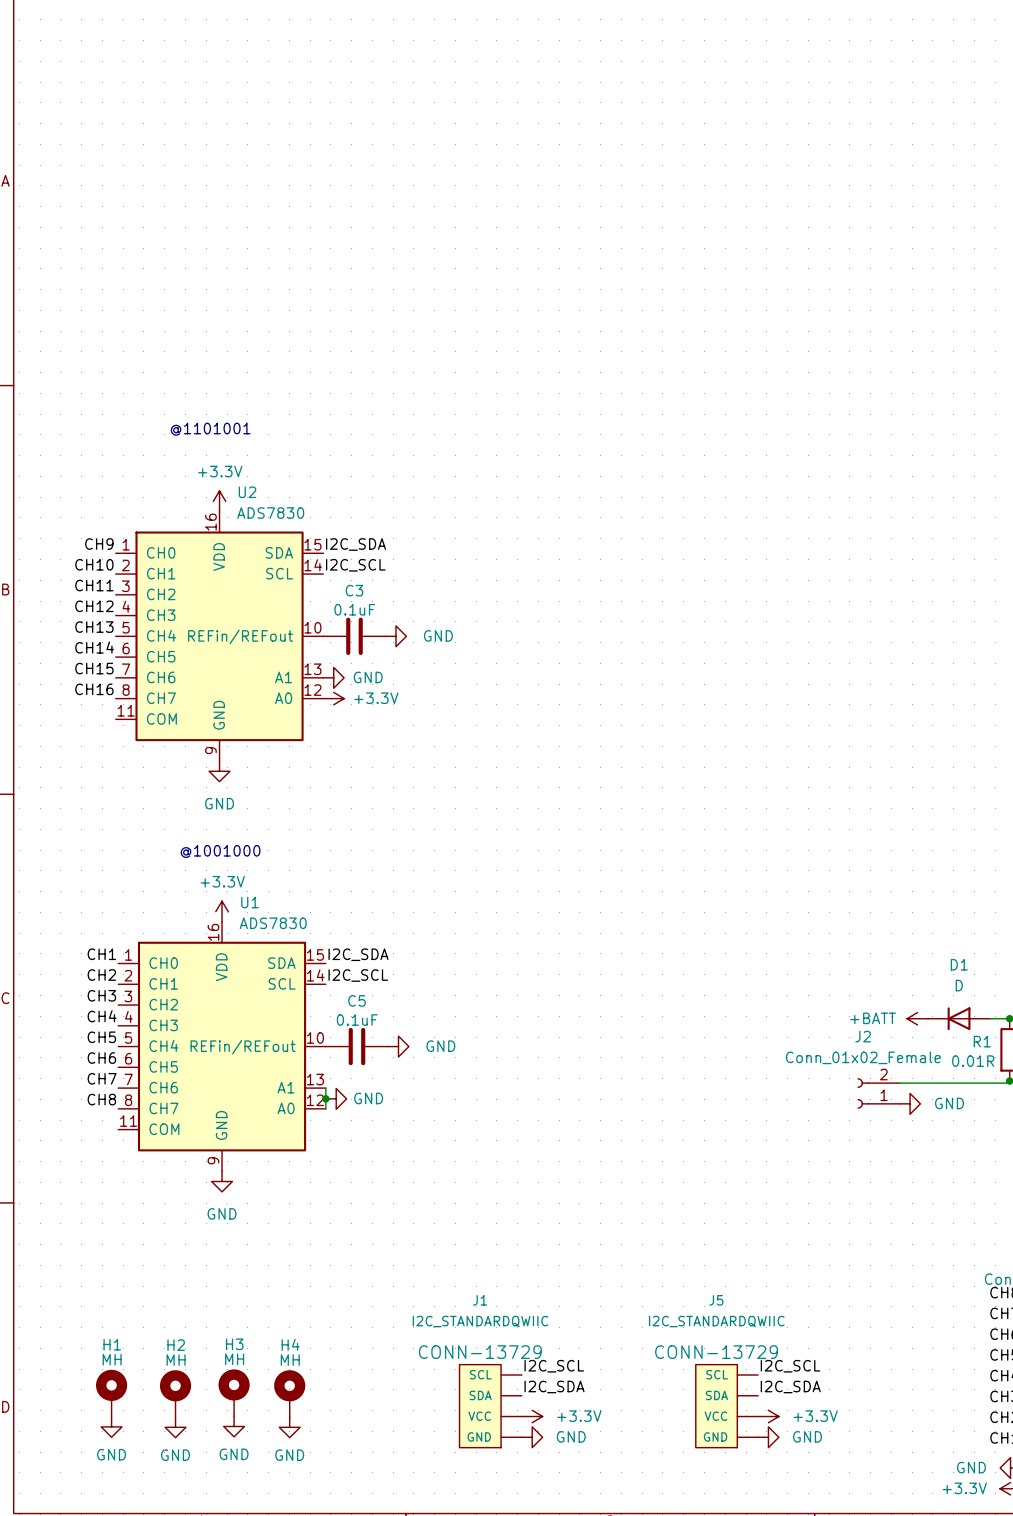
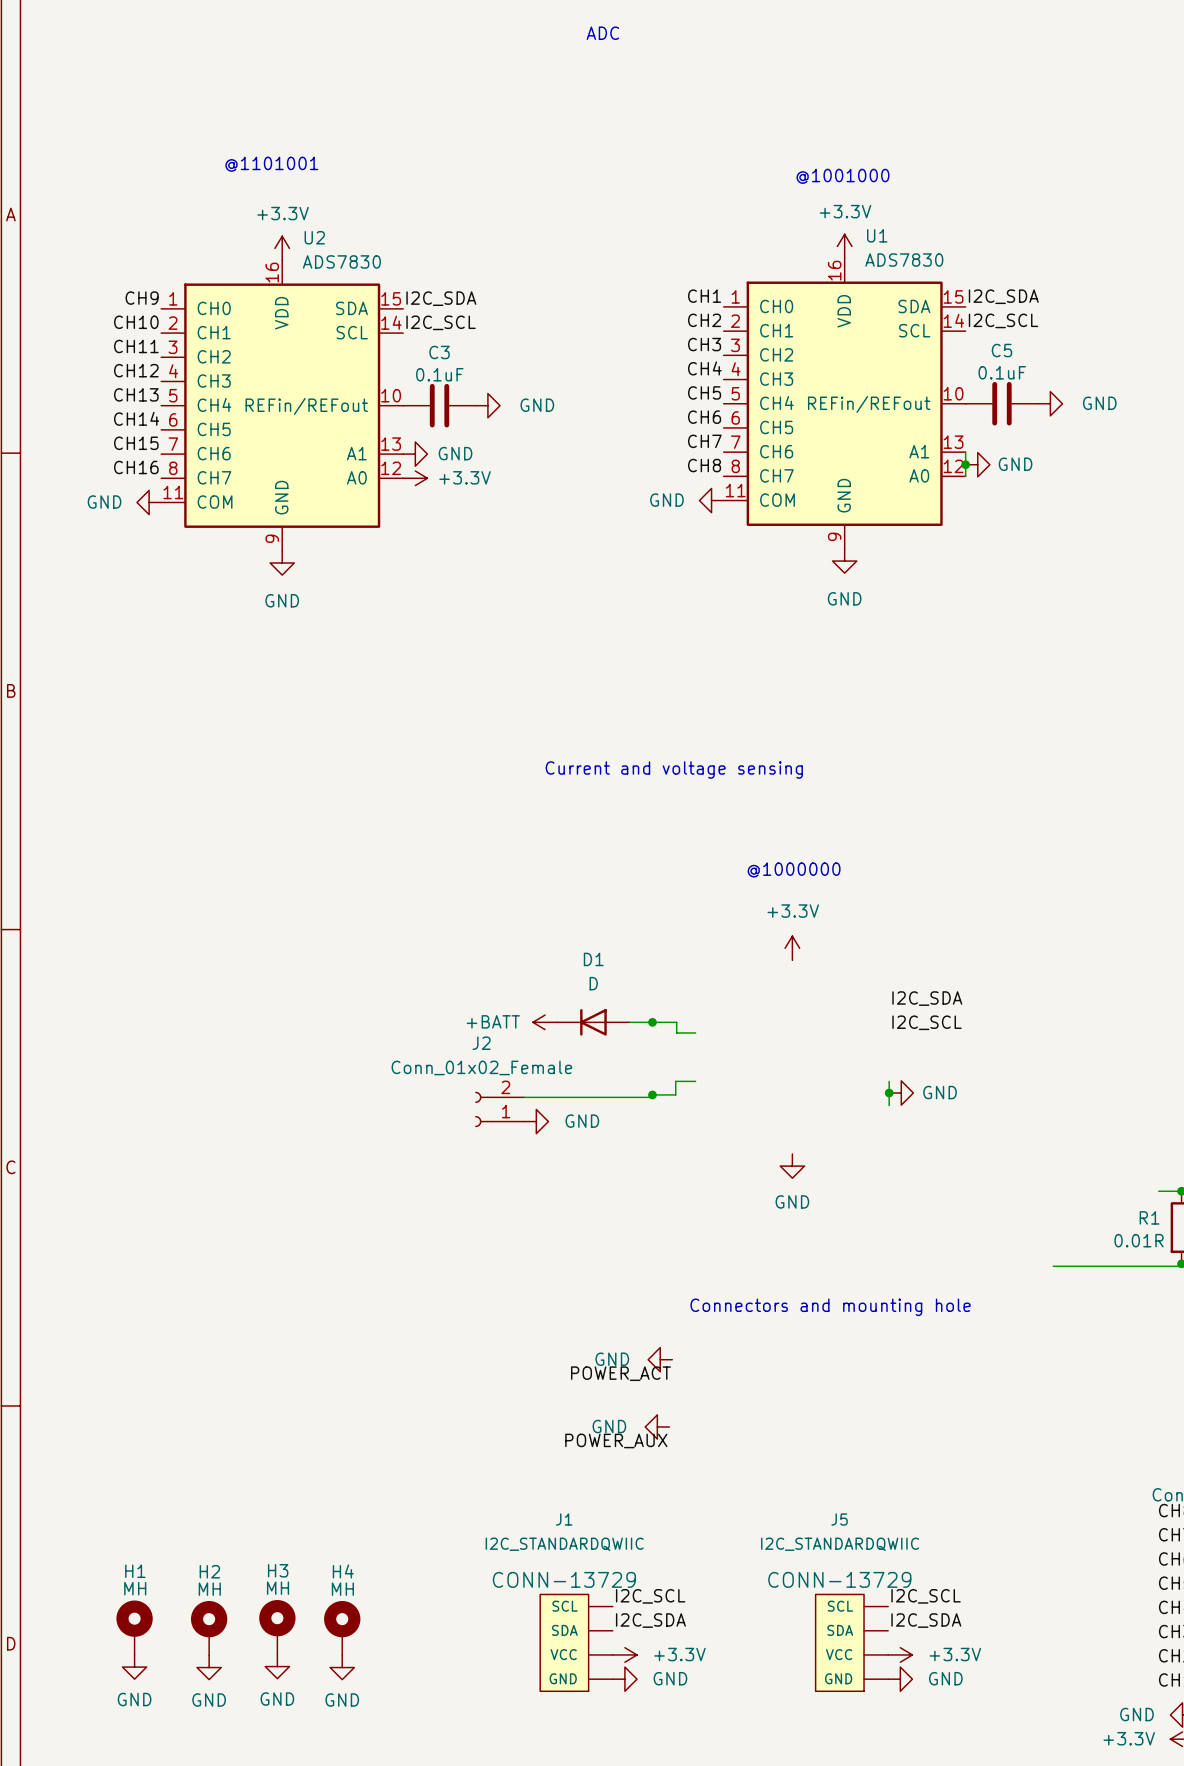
text: none -> ADC (602, 33)
text: none -> @1101001 (271, 164)
text: none -> @1001000 (842, 176)
power symbol: none -> +3.3V (844, 246)
power symbol: none -> +3.3V (282, 248)
label: none -> CH1 (704, 296)
label: none -> I2C_SDA (1003, 296)
label: none -> CH9 (142, 298)
label: none -> I2C_SDA (441, 298)
label: none -> CH2 (704, 320)
label: none -> I2C_SCL (1003, 320)
label: none -> CH10 (136, 322)
label: none -> I2C_SCL (441, 322)
label: none -> CH3 (704, 344)
label: none -> CH11 (136, 346)
label: none -> CH4 (704, 368)
label: none -> CH12 (136, 370)
label: none -> CH5 (704, 392)
label: none -> CH13 (136, 394)
power symbol: none -> GND (1050, 403)
power symbol: none -> GND (487, 405)
label: none -> CH6 (704, 417)
label: none -> CH14 (136, 418)
label: none -> CH7 (704, 441)
label: none -> CH15 (136, 443)
wire: none -> (965, 452) (965, 476)
power symbol: none -> GND (415, 454)
junction: none -> (965, 464)
power symbol: none -> GND (977, 464)
label: none -> CH8 (704, 465)
label: none -> CH16 (136, 467)
power symbol: none -> +3.3V (415, 478)
power symbol: none -> GND (711, 500)
power symbol: none -> GND (149, 502)
text: @1101001 (210, 429) -> none
power symbol: none -> GND (844, 561)
power symbol: none -> GND (282, 562)
power symbol: +3.3V (219, 501) -> none
label: CH9 (99, 544) -> none
label: I2C_SDA (356, 544) -> none
label: CH10 (94, 564) -> none
label: I2C_SCL (355, 565) -> none
label: CH11 (94, 585) -> none
label: CH12 (94, 606) -> none
label: CH13 (94, 627) -> none
U2 position: (219, 636) -> (282, 405)
C3 position: (354, 636) -> (439, 405)
power symbol: GND (396, 636) -> none
label: CH14 (94, 647) -> none
text: none -> Current and voltage sensing (674, 770)
label: CH15 (94, 668) -> none
power symbol: GND (333, 677) -> none
label: CH16 (94, 689) -> none
power symbol: +3.3V (333, 698) -> none
text: none -> @1000000 (794, 870)
power symbol: GND (219, 771) -> none
power symbol: none -> +3.3V (792, 948)
text: @1001000 (220, 851) -> none
label: none -> I2C_SDA (927, 998)
power symbol: none -> +BATT (545, 1022)
wire: none -> (629, 1022) (676, 1022) (676, 1032) (695, 1032)
junction: none -> (652, 1022)
label: none -> I2C_SCL (927, 1022)
power symbol: +3.3V (222, 911) -> none
wire: none -> (695, 1081) (675, 1081) (675, 1094) (652, 1094) (652, 1097) (524, 1097)
wire: none -> (889, 1081) (889, 1105)
junction: none -> (889, 1093)
power symbol: none -> GND (901, 1093)
junction: none -> (652, 1094)
label: CH1 (101, 954) -> none
label: I2C_SDA (358, 954) -> none
power symbol: none -> GND (536, 1121)
label: CH2 (101, 975) -> none
label: I2C_SCL (358, 975) -> none
label: CH3 (101, 995) -> none
power symbol: none -> GND (792, 1166)
label: CH4 (102, 1016) -> none
power symbol: +BATT (917, 1018) -> none
D1 position: (959, 1018) -> (593, 1022)
label: CH5 (101, 1037) -> none
U1 position: (222, 1046) -> (844, 403)
C5 position: (356, 1046) -> (1001, 403)
power symbol: GND (398, 1046) -> none
label: CH6 (101, 1058) -> none
label: CH7 (102, 1078) -> none
wire: (325, 1088) (325, 1108) -> none
J2 position: (878, 1093) -> (499, 1109)
junction: (325, 1098) -> none
power symbol: GND (336, 1098) -> none
label: CH8 (101, 1099) -> none
power symbol: GND (910, 1103) -> none
text: none -> Connectors and mounting hole (830, 1307)
power symbol: none -> GND (660, 1359)
label: none -> POWER_ACT (620, 1373)
power symbol: GND (222, 1181) -> none
power symbol: none -> GND (657, 1426)
label: none -> POWER_AUX (616, 1440)

